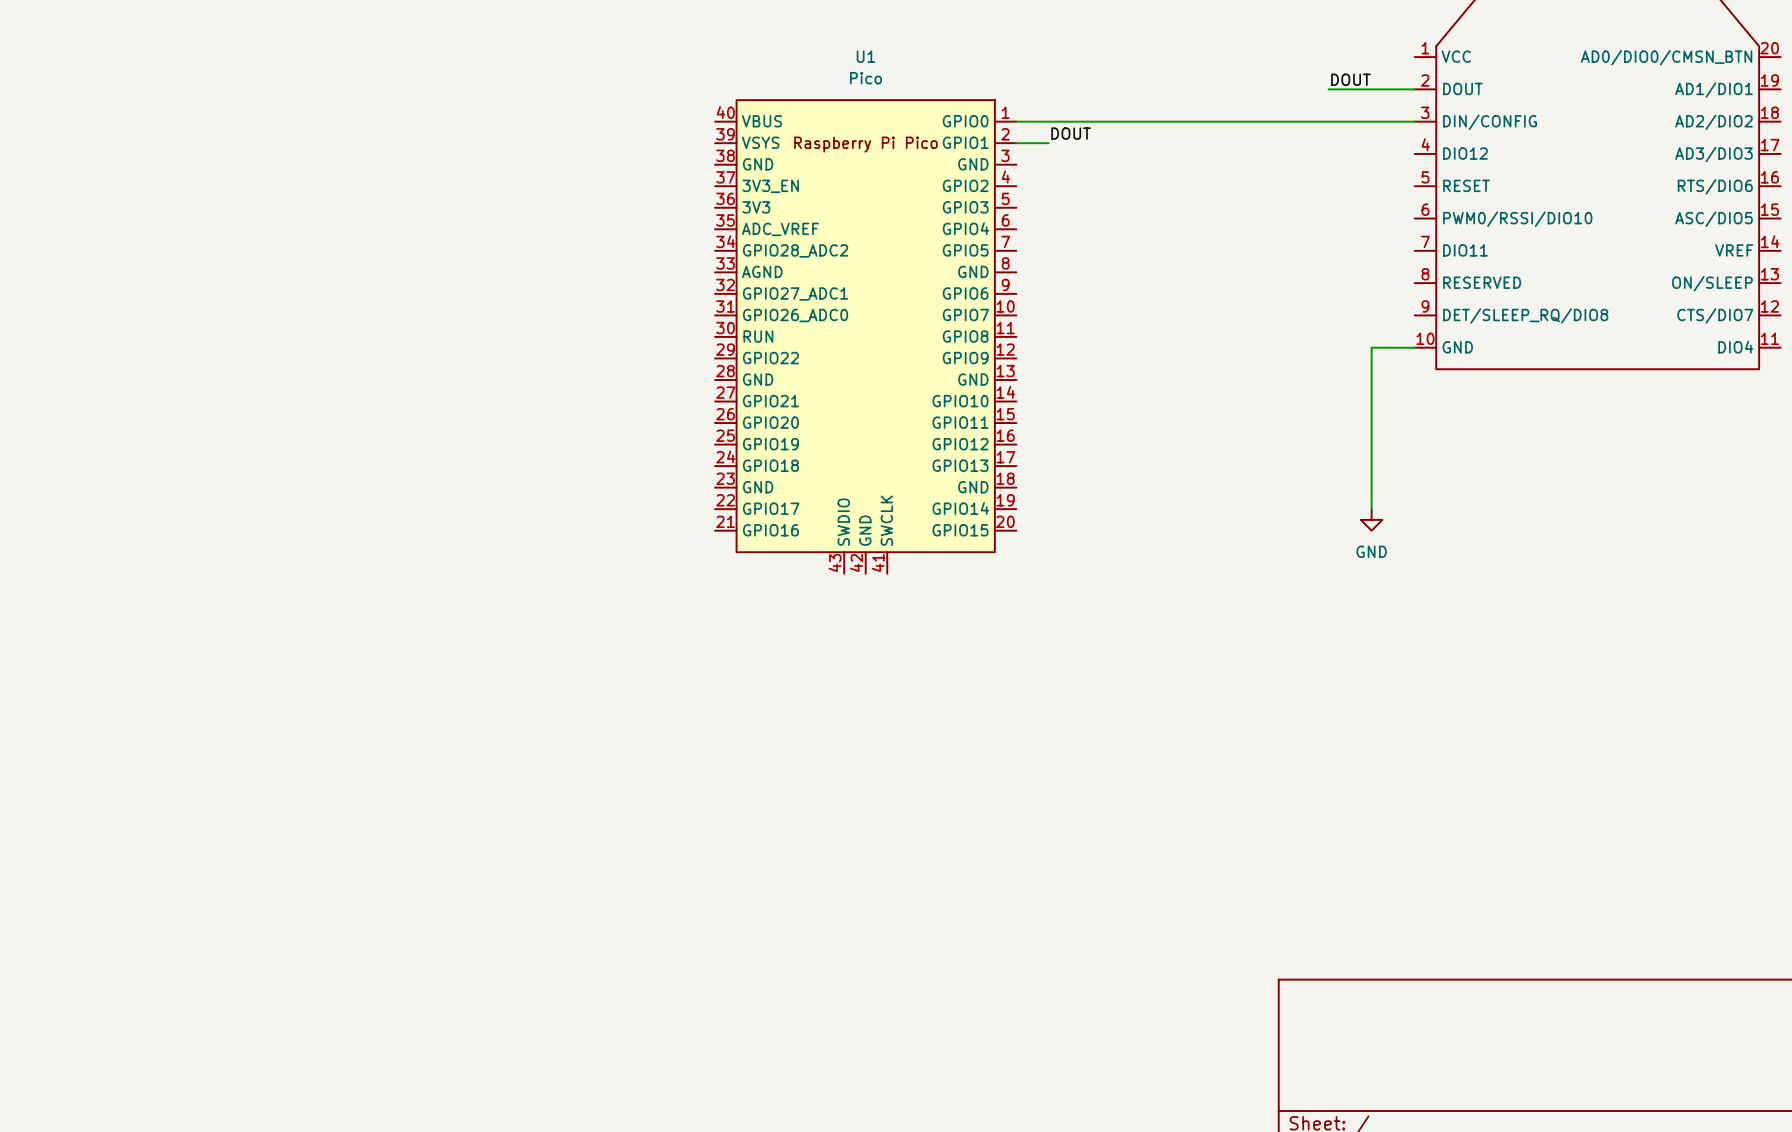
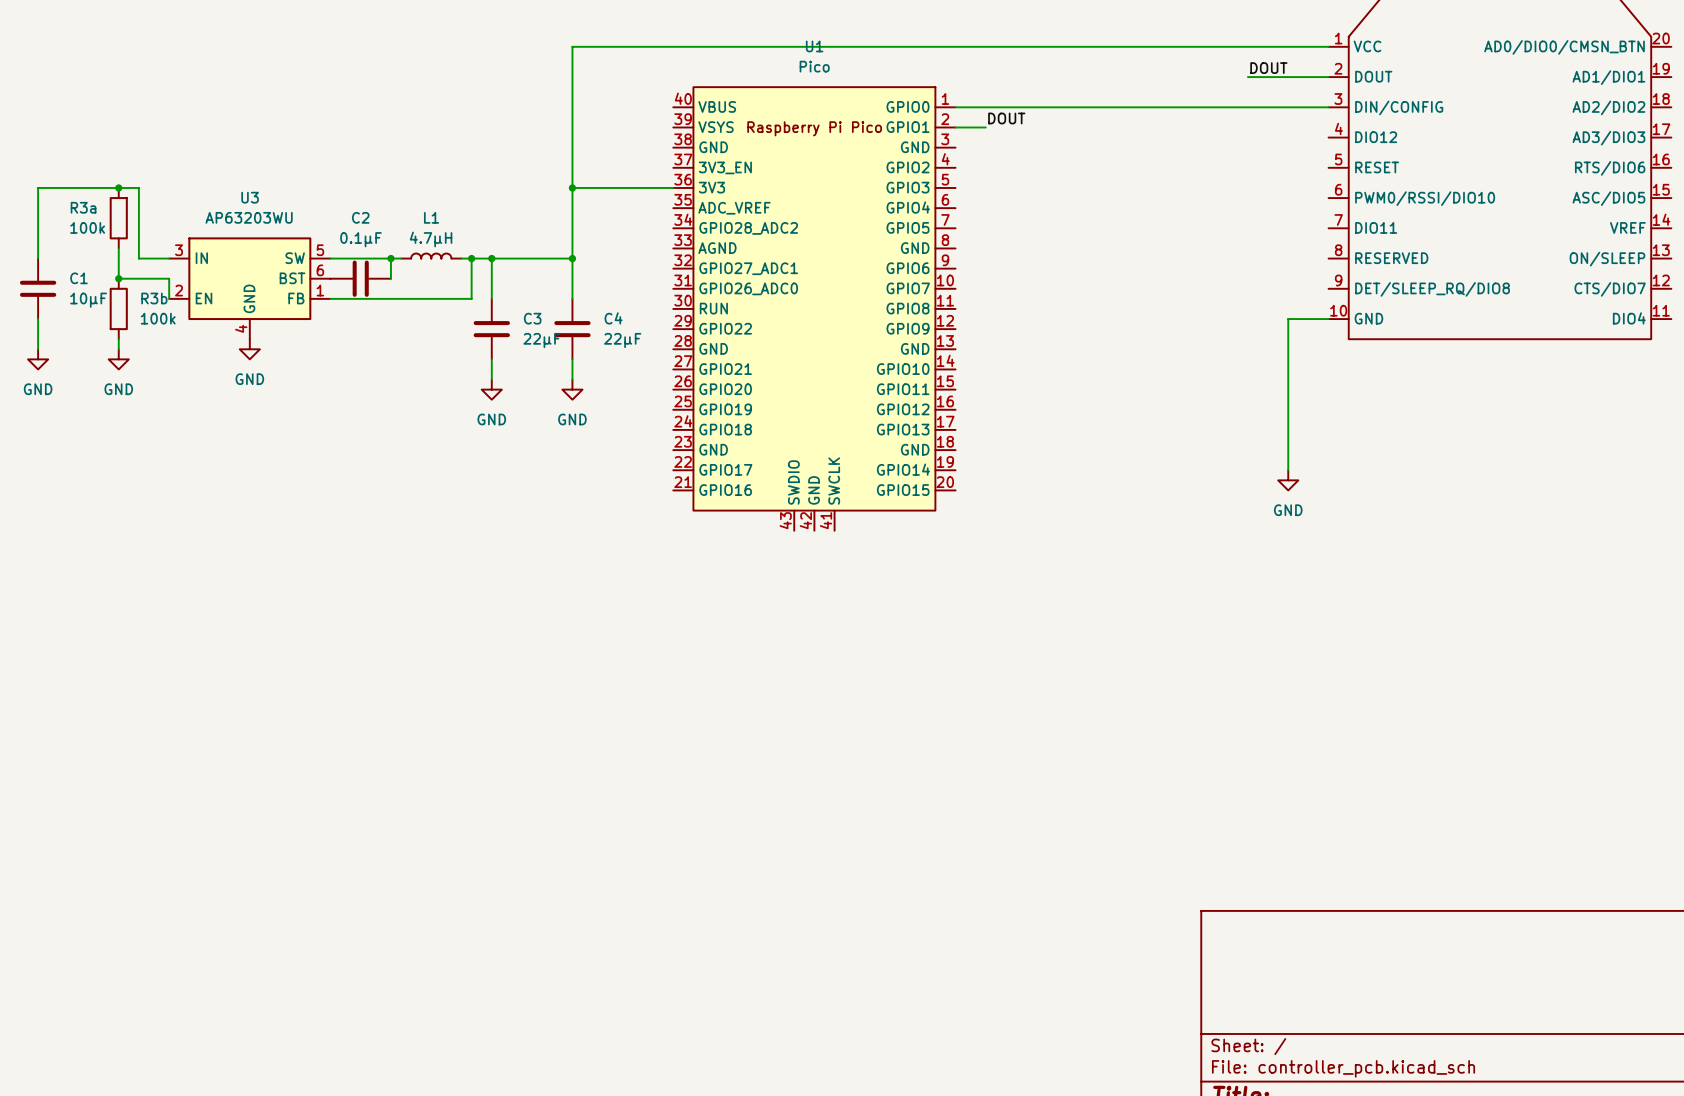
wire: none -> (1328, 46) (572, 46) (572, 298)
junction: none -> (118, 187)
wire: none -> (572, 187) (673, 187)
junction: none -> (572, 187)
R3a: none -> 100k (118, 218)
wire: none -> (118, 248) (118, 278) (169, 278) (169, 298)
L1: none -> 4.7µH (431, 256)
wire: none -> (38, 258) (38, 187) (138, 187) (138, 258) (169, 258)
wire: none -> (330, 258) (401, 258)
wire: none -> (390, 258) (390, 278)
junction: none -> (390, 258)
wire: none -> (461, 258) (572, 258)
wire: none -> (471, 258) (471, 298) (330, 298)
junction: none -> (471, 258)
wire: none -> (491, 258) (491, 298)
junction: none -> (491, 258)
junction: none -> (572, 258)
junction: none -> (118, 278)
C2: none -> 0.1µF (360, 278)
U3: none -> AP63203WU (249, 288)
C1: none -> 10µF (38, 288)
R3b: none -> 100k (118, 308)
wire: none -> (38, 319) (38, 349)
C3: none -> 22µF (491, 329)
C4: none -> 22µF (572, 329)
wire: none -> (118, 339) (118, 349)
power symbol: none -> GND (249, 349)
power symbol: none -> GND (38, 359)
power symbol: none -> GND (118, 359)
wire: none -> (491, 359) (491, 379)
wire: none -> (572, 359) (572, 379)
power symbol: none -> GND (491, 389)
power symbol: none -> GND (572, 389)

